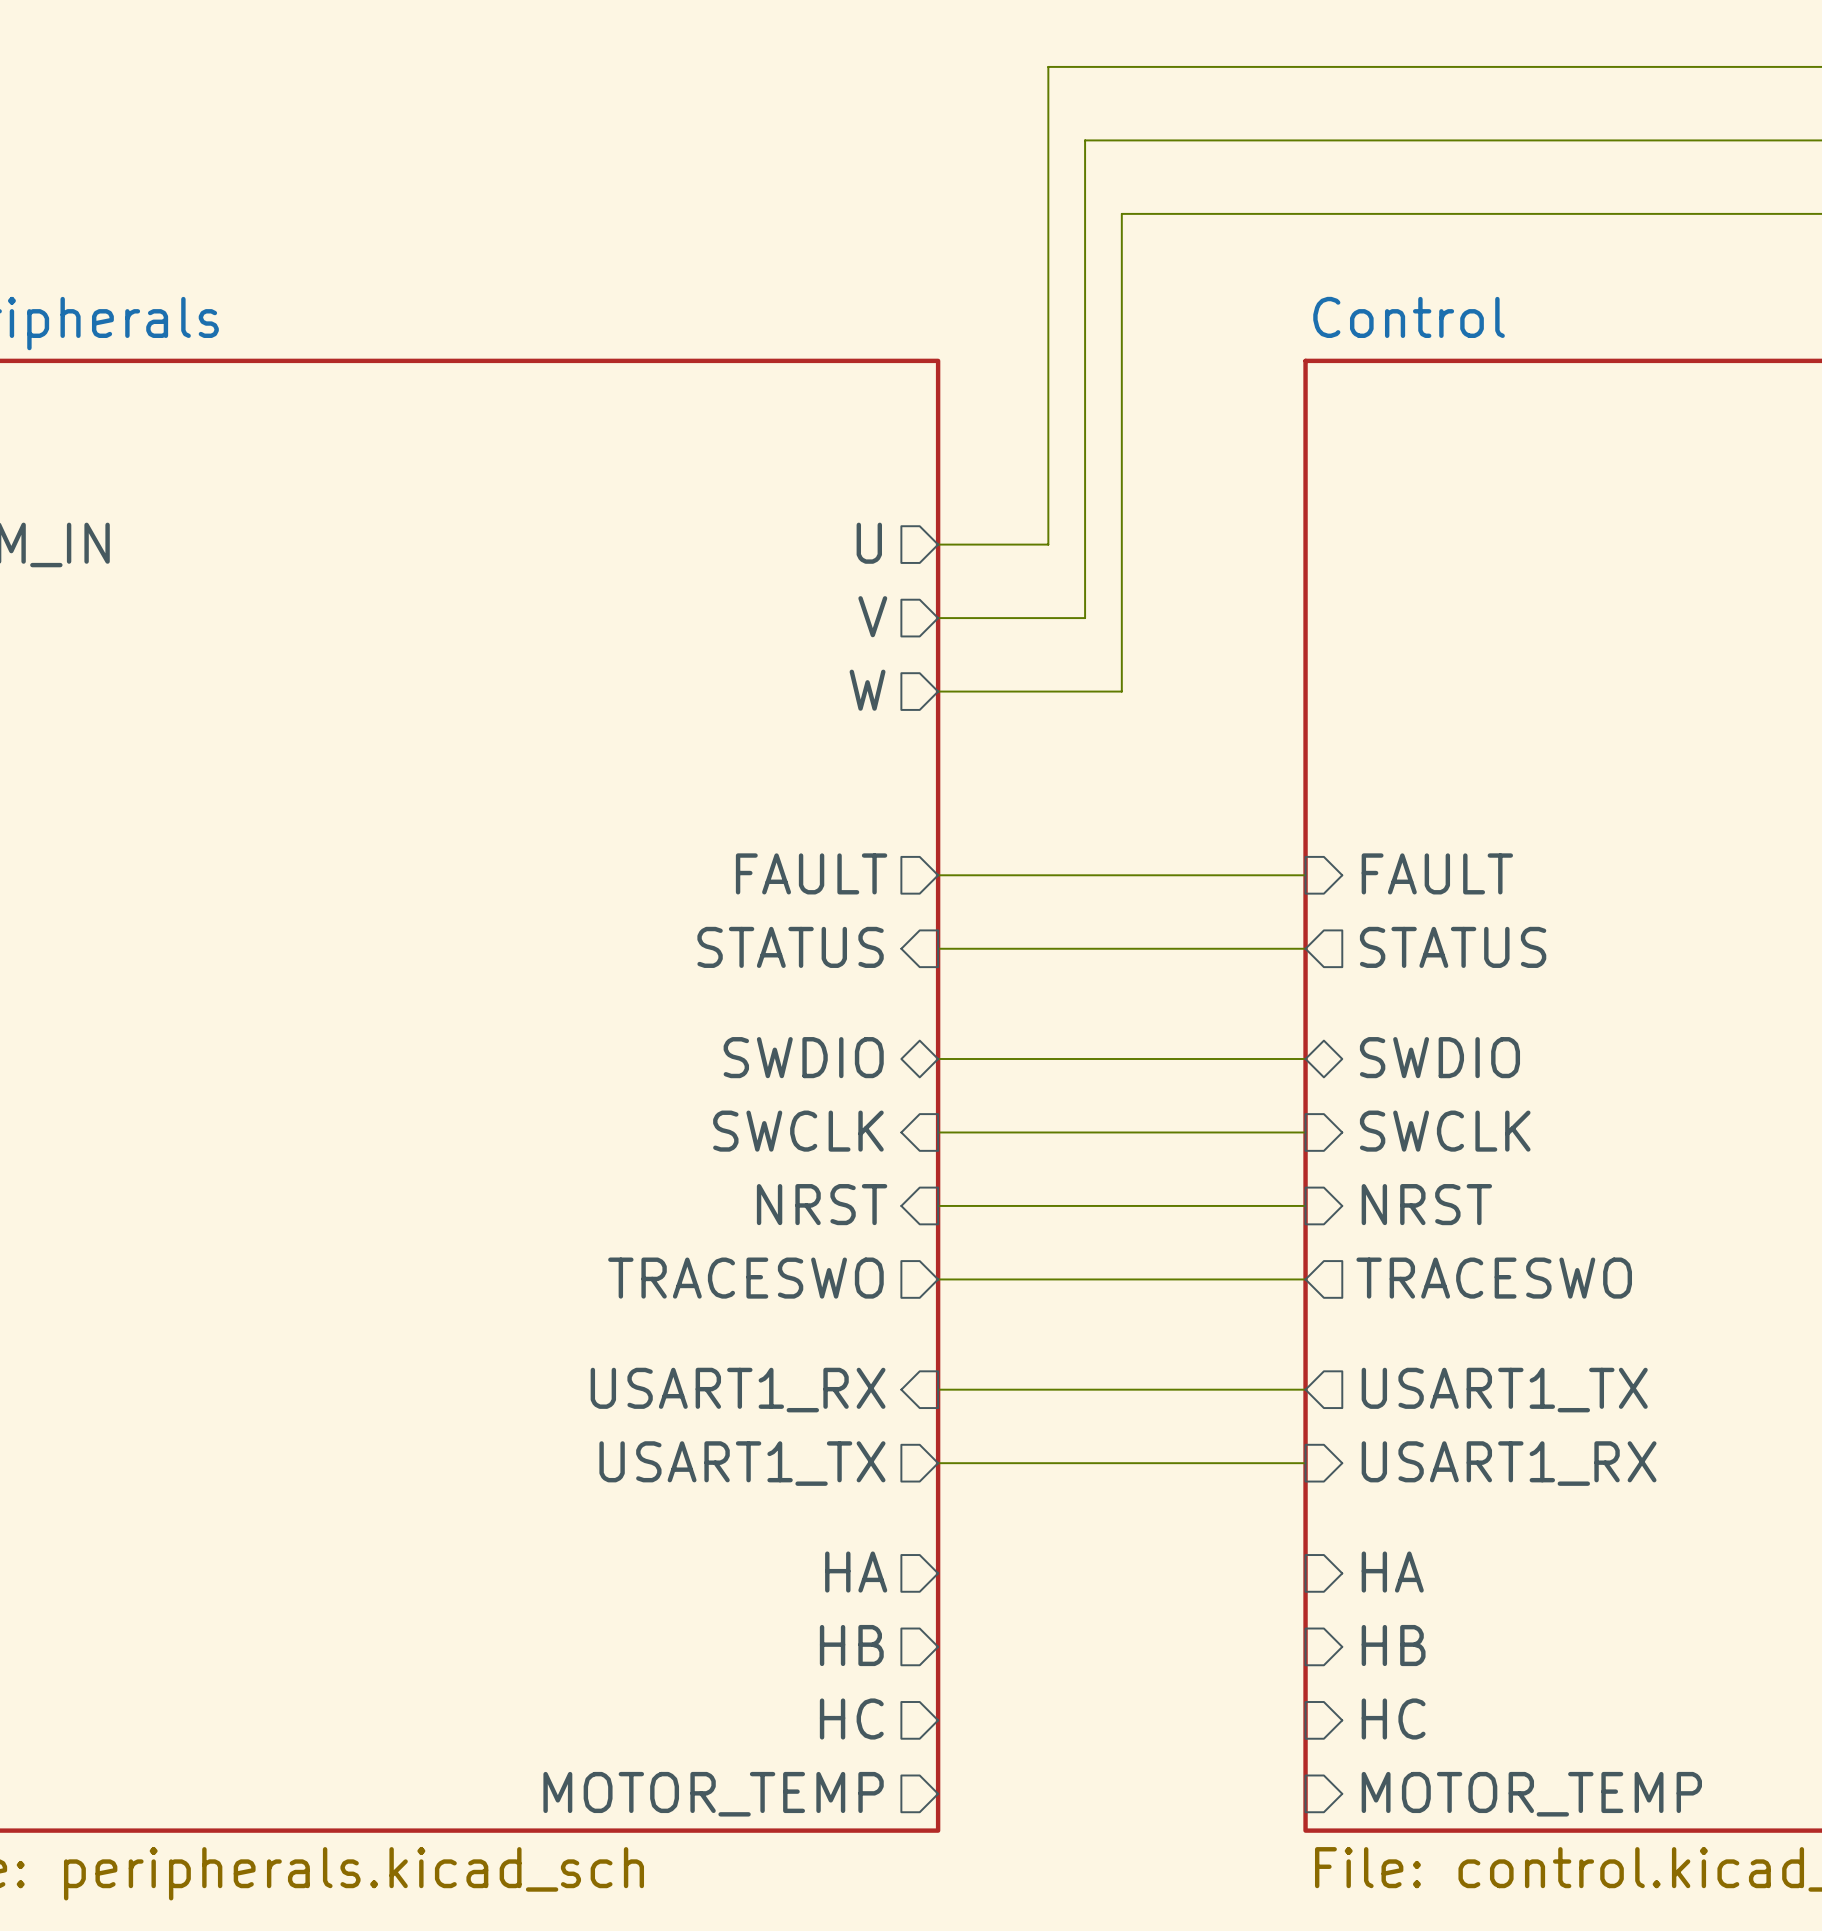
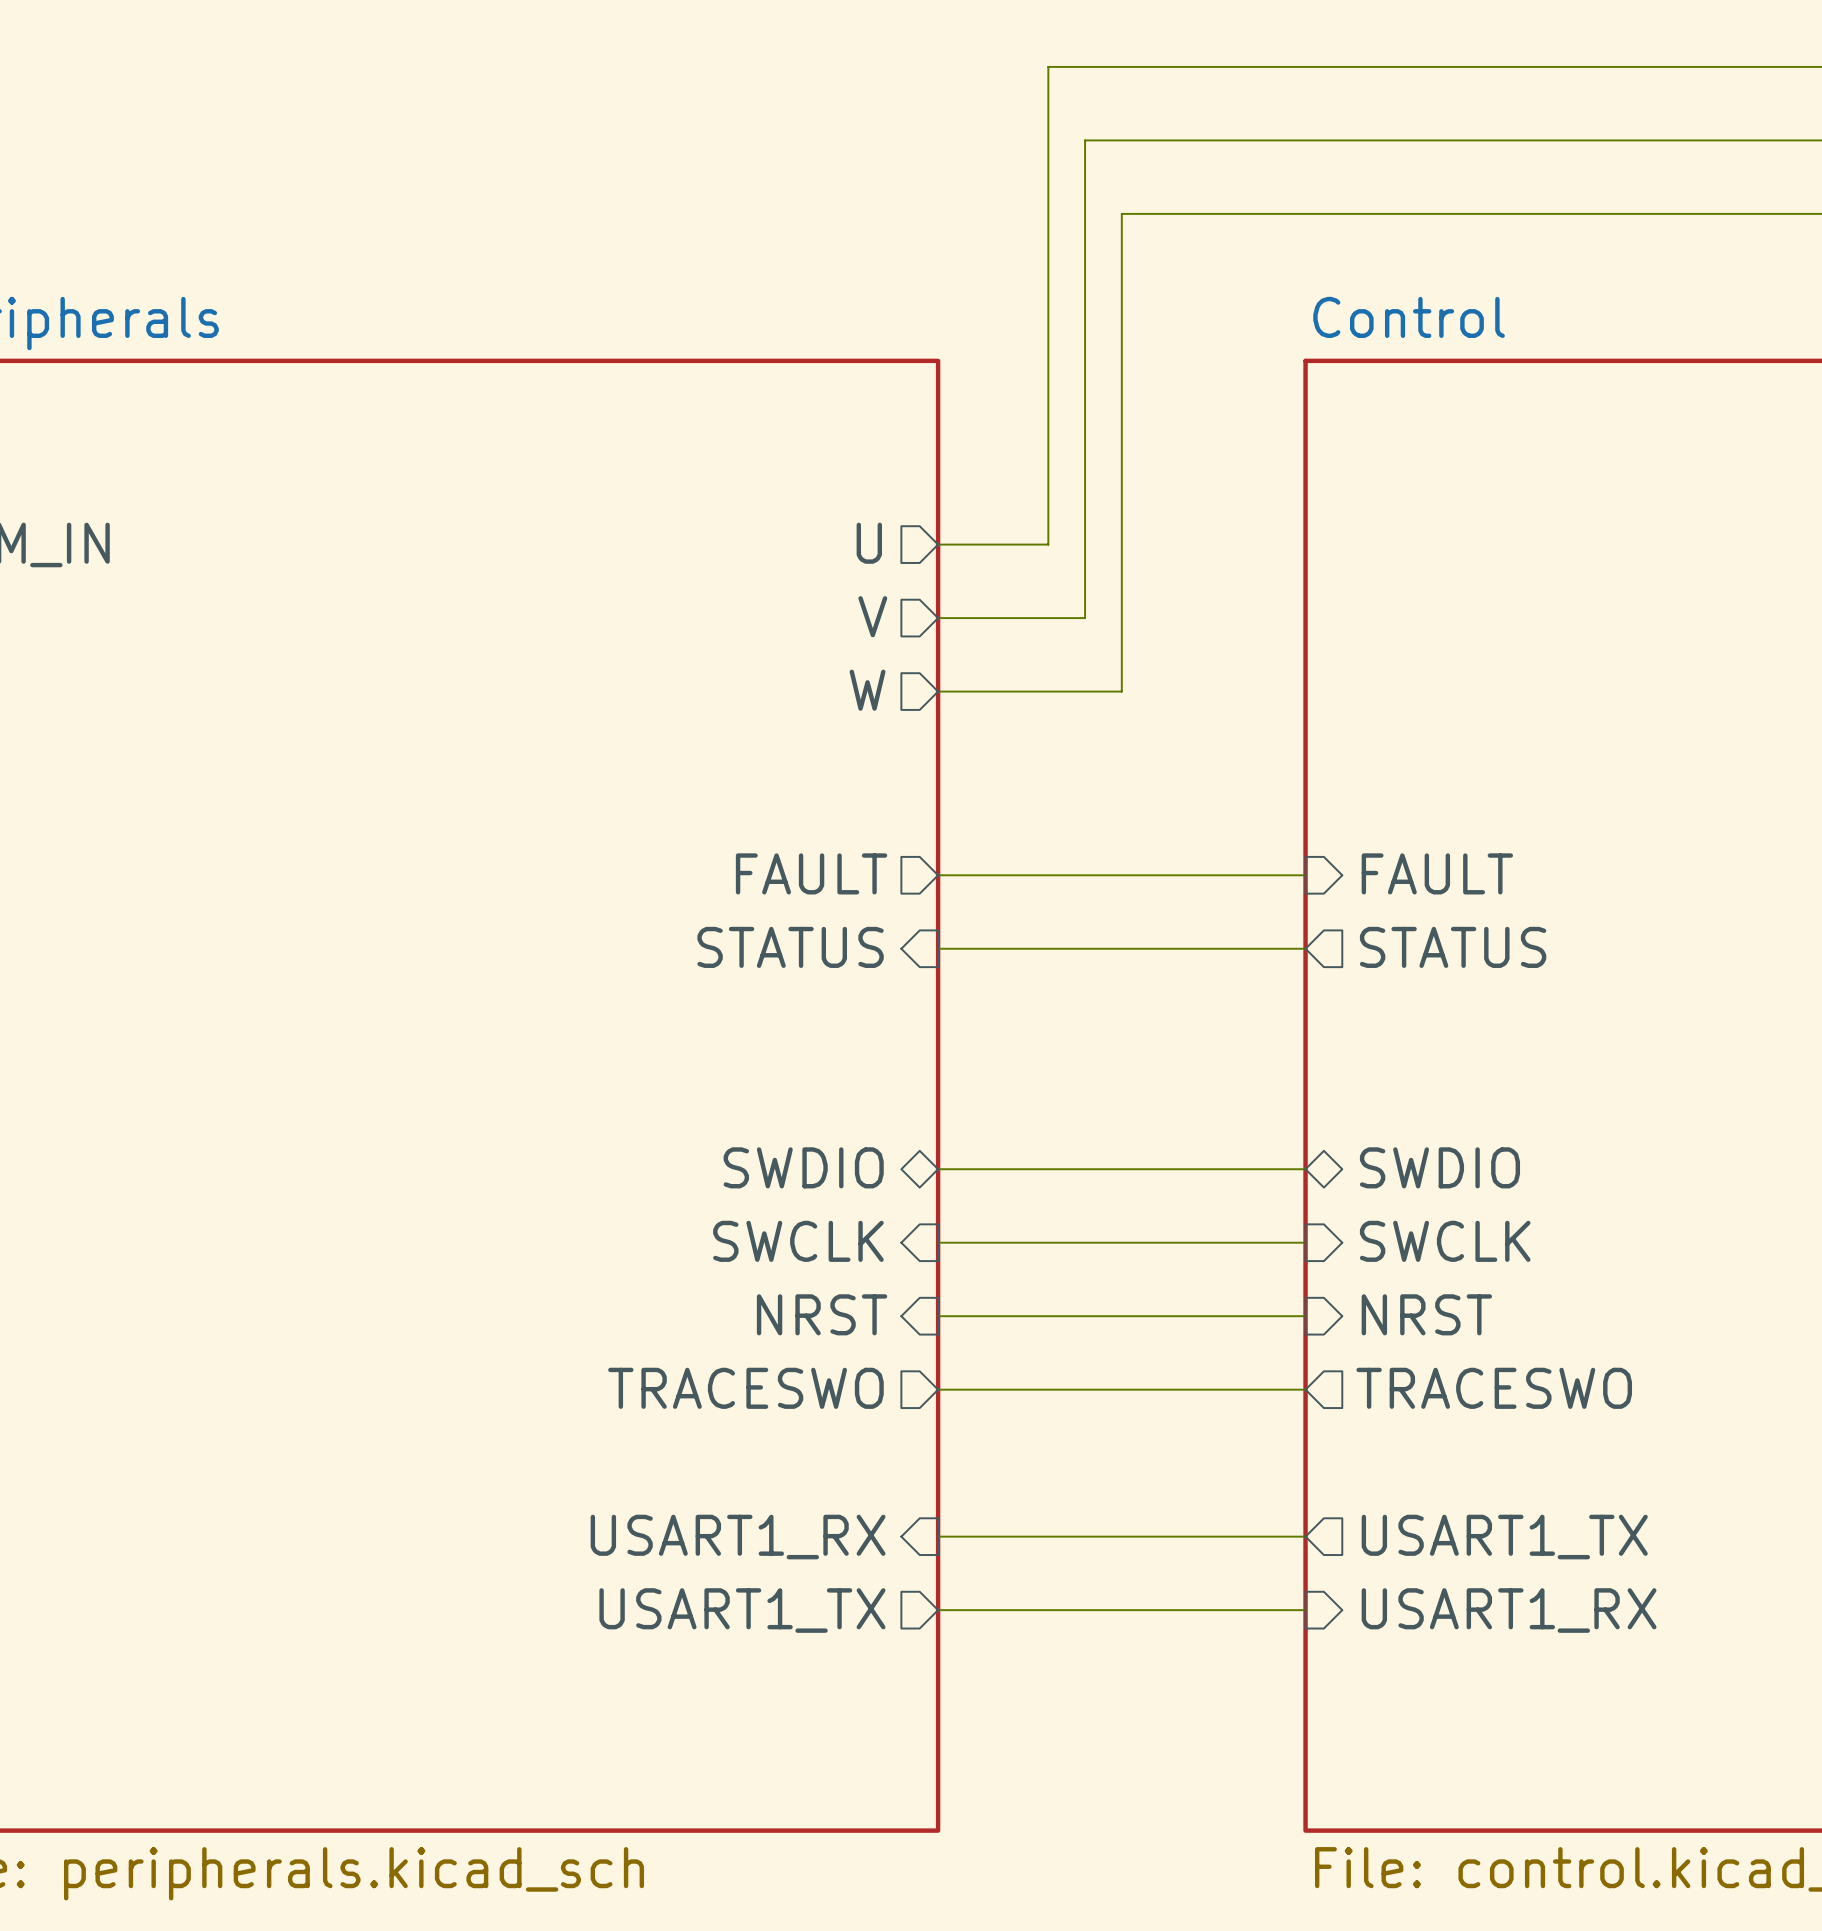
sheet pin position: SWDIO (803, 1057) -> SWDIO (803, 1167)
sheet pin position: SWDIO (1439, 1057) -> SWDIO (1439, 1167)
wire: (938, 1058) (1305, 1058) -> (938, 1536) (1305, 1536)
sheet pin position: SWCLK (798, 1131) -> SWCLK (798, 1241)
sheet pin position: SWCLK (1445, 1131) -> SWCLK (1445, 1241)
wire: (938, 1132) (1305, 1132) -> (938, 1169) (1305, 1169)
sheet pin position: NRST (822, 1204) -> NRST (822, 1314)
sheet pin position: NRST (1426, 1204) -> NRST (1426, 1314)
wire: (938, 1205) (1305, 1205) -> (938, 1242) (1305, 1242)
sheet pin: TRACESWO (745, 1278) -> none
sheet pin: TRACESWO (1494, 1278) -> none
wire: (938, 1279) (1305, 1279) -> (938, 1316) (1305, 1316)
sheet pin shape: input (738, 1390) -> output (745, 1388)
sheet pin: USART1_RX (738, 1390) -> TRACESWO (745, 1388)
sheet pin: USART1_TX (1504, 1390) -> TRACESWO (1494, 1388)
sheet pin position: USART1_TX (742, 1463) -> USART1_TX (742, 1610)
wire: (938, 1463) (1305, 1463) -> (938, 1610) (1305, 1610)
sheet pin position: USART1_RX (1509, 1463) -> USART1_RX (1509, 1610)
sheet pin: none -> USART1_RX (738, 1537)
sheet pin: none -> USART1_TX (1504, 1537)
sheet pin: HA (856, 1572) -> none
sheet pin: HA (1392, 1572) -> none
sheet pin: HB (851, 1645) -> none
sheet pin: HB (1393, 1645) -> none
sheet pin: HC (851, 1719) -> none
sheet pin: HC (1393, 1719) -> none
sheet pin: MOTOR_TEMP (713, 1794) -> none
sheet pin: MOTOR_TEMP (1531, 1794) -> none

